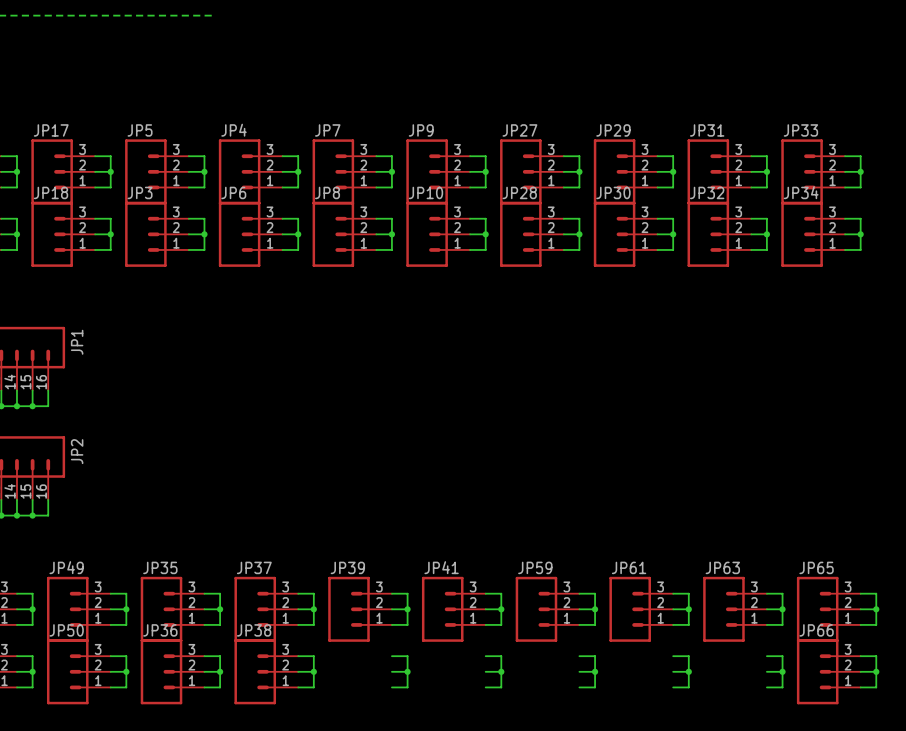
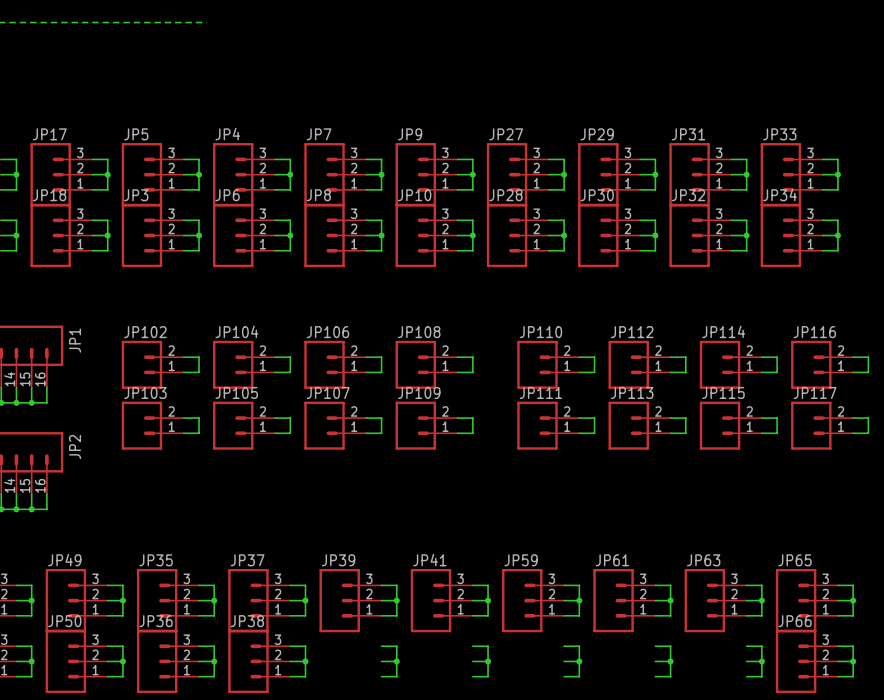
wire: none -> (183, 357) (199, 357) (199, 372) (183, 372)
wire: none -> (275, 357) (290, 357) (290, 372) (275, 372)
wire: none -> (366, 357) (381, 357) (381, 372) (366, 372)
wire: none -> (457, 357) (472, 357) (472, 372) (457, 372)
wire: none -> (579, 357) (594, 357) (594, 372) (579, 372)
wire: none -> (670, 357) (685, 357) (685, 372) (670, 372)
wire: none -> (761, 357) (777, 357) (777, 372) (761, 372)
wire: none -> (853, 357) (868, 357) (868, 372) (853, 372)
JP102: none -> (152, 364)
JP104: none -> (244, 364)
JP106: none -> (335, 364)
JP108: none -> (426, 364)
JP110: none -> (548, 364)
JP112: none -> (639, 364)
JP114: none -> (730, 364)
JP116: none -> (822, 364)
wire: none -> (183, 418) (199, 418) (199, 433) (183, 433)
wire: none -> (275, 418) (290, 418) (290, 433) (275, 433)
wire: none -> (366, 418) (381, 418) (381, 433) (366, 433)
wire: none -> (457, 418) (472, 418) (472, 433) (457, 433)
wire: none -> (579, 418) (594, 418) (594, 433) (579, 433)
wire: none -> (670, 418) (685, 418) (685, 433) (670, 433)
wire: none -> (761, 418) (777, 418) (777, 433) (761, 433)
wire: none -> (853, 418) (868, 418) (868, 433) (853, 433)
JP103: none -> (152, 425)
JP105: none -> (244, 425)
JP107: none -> (335, 425)
JP109: none -> (426, 425)
JP111: none -> (548, 425)
JP113: none -> (639, 425)
JP115: none -> (730, 425)
JP117: none -> (822, 425)

